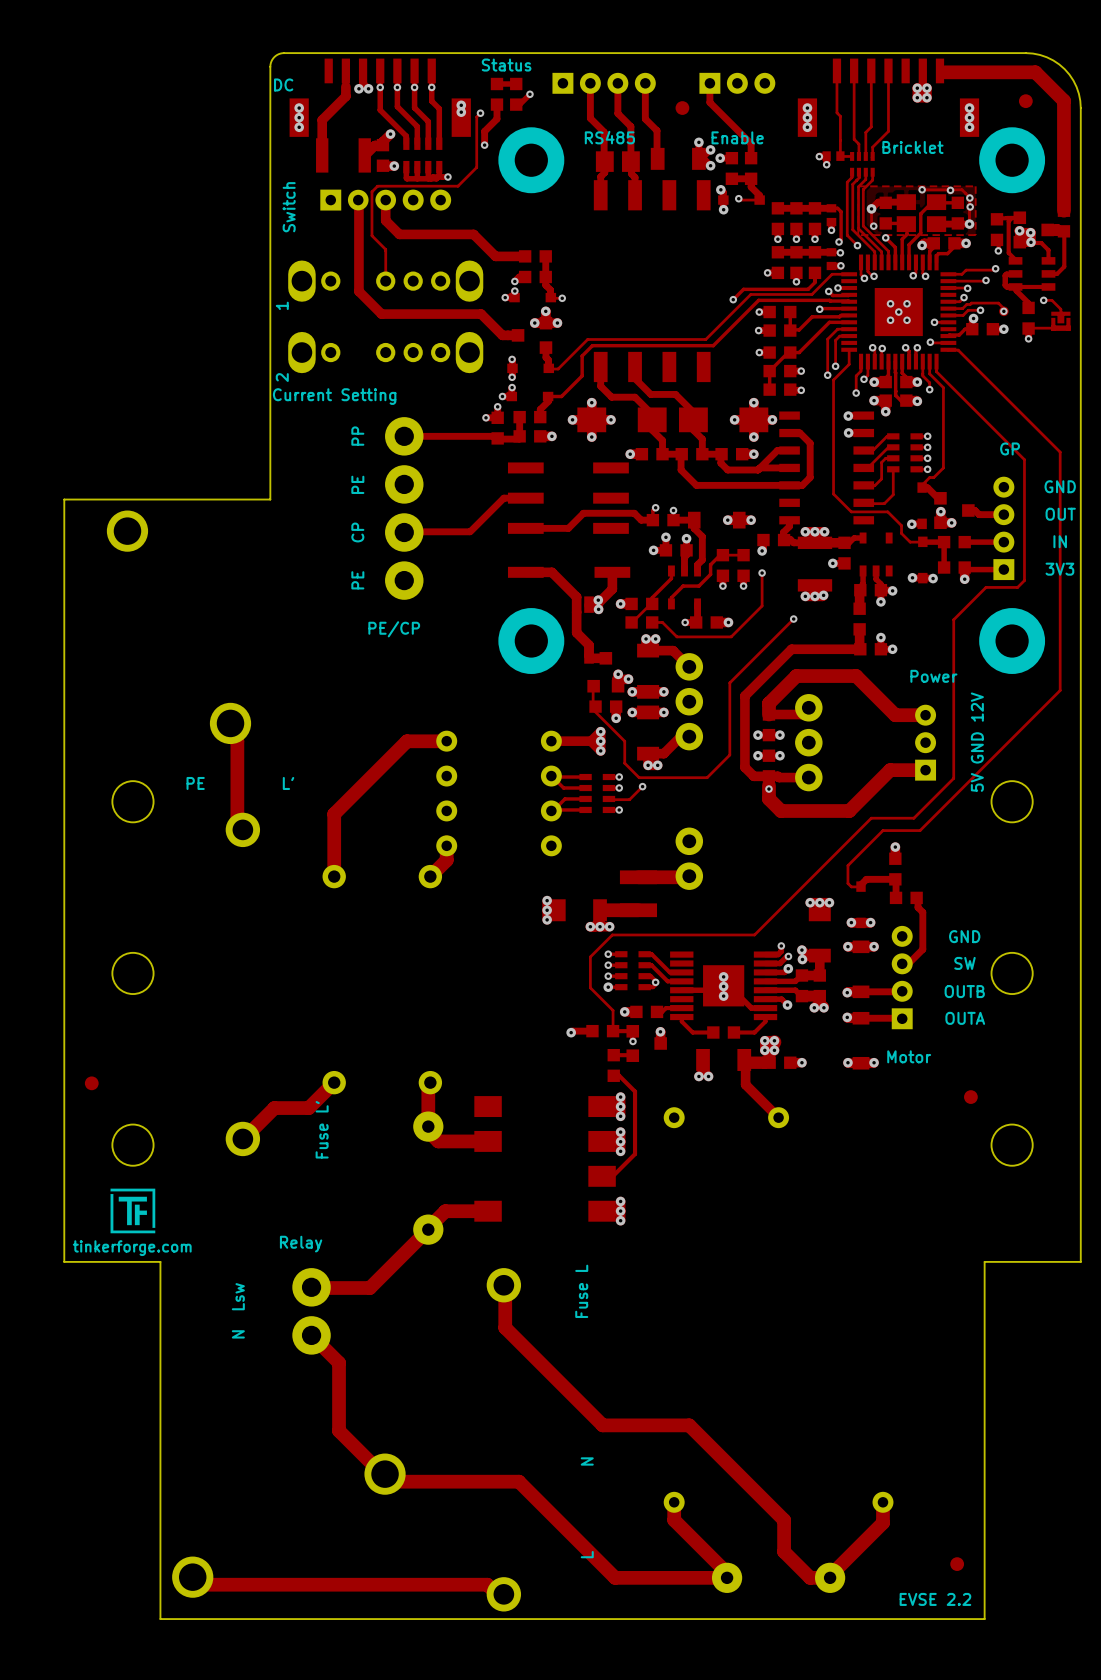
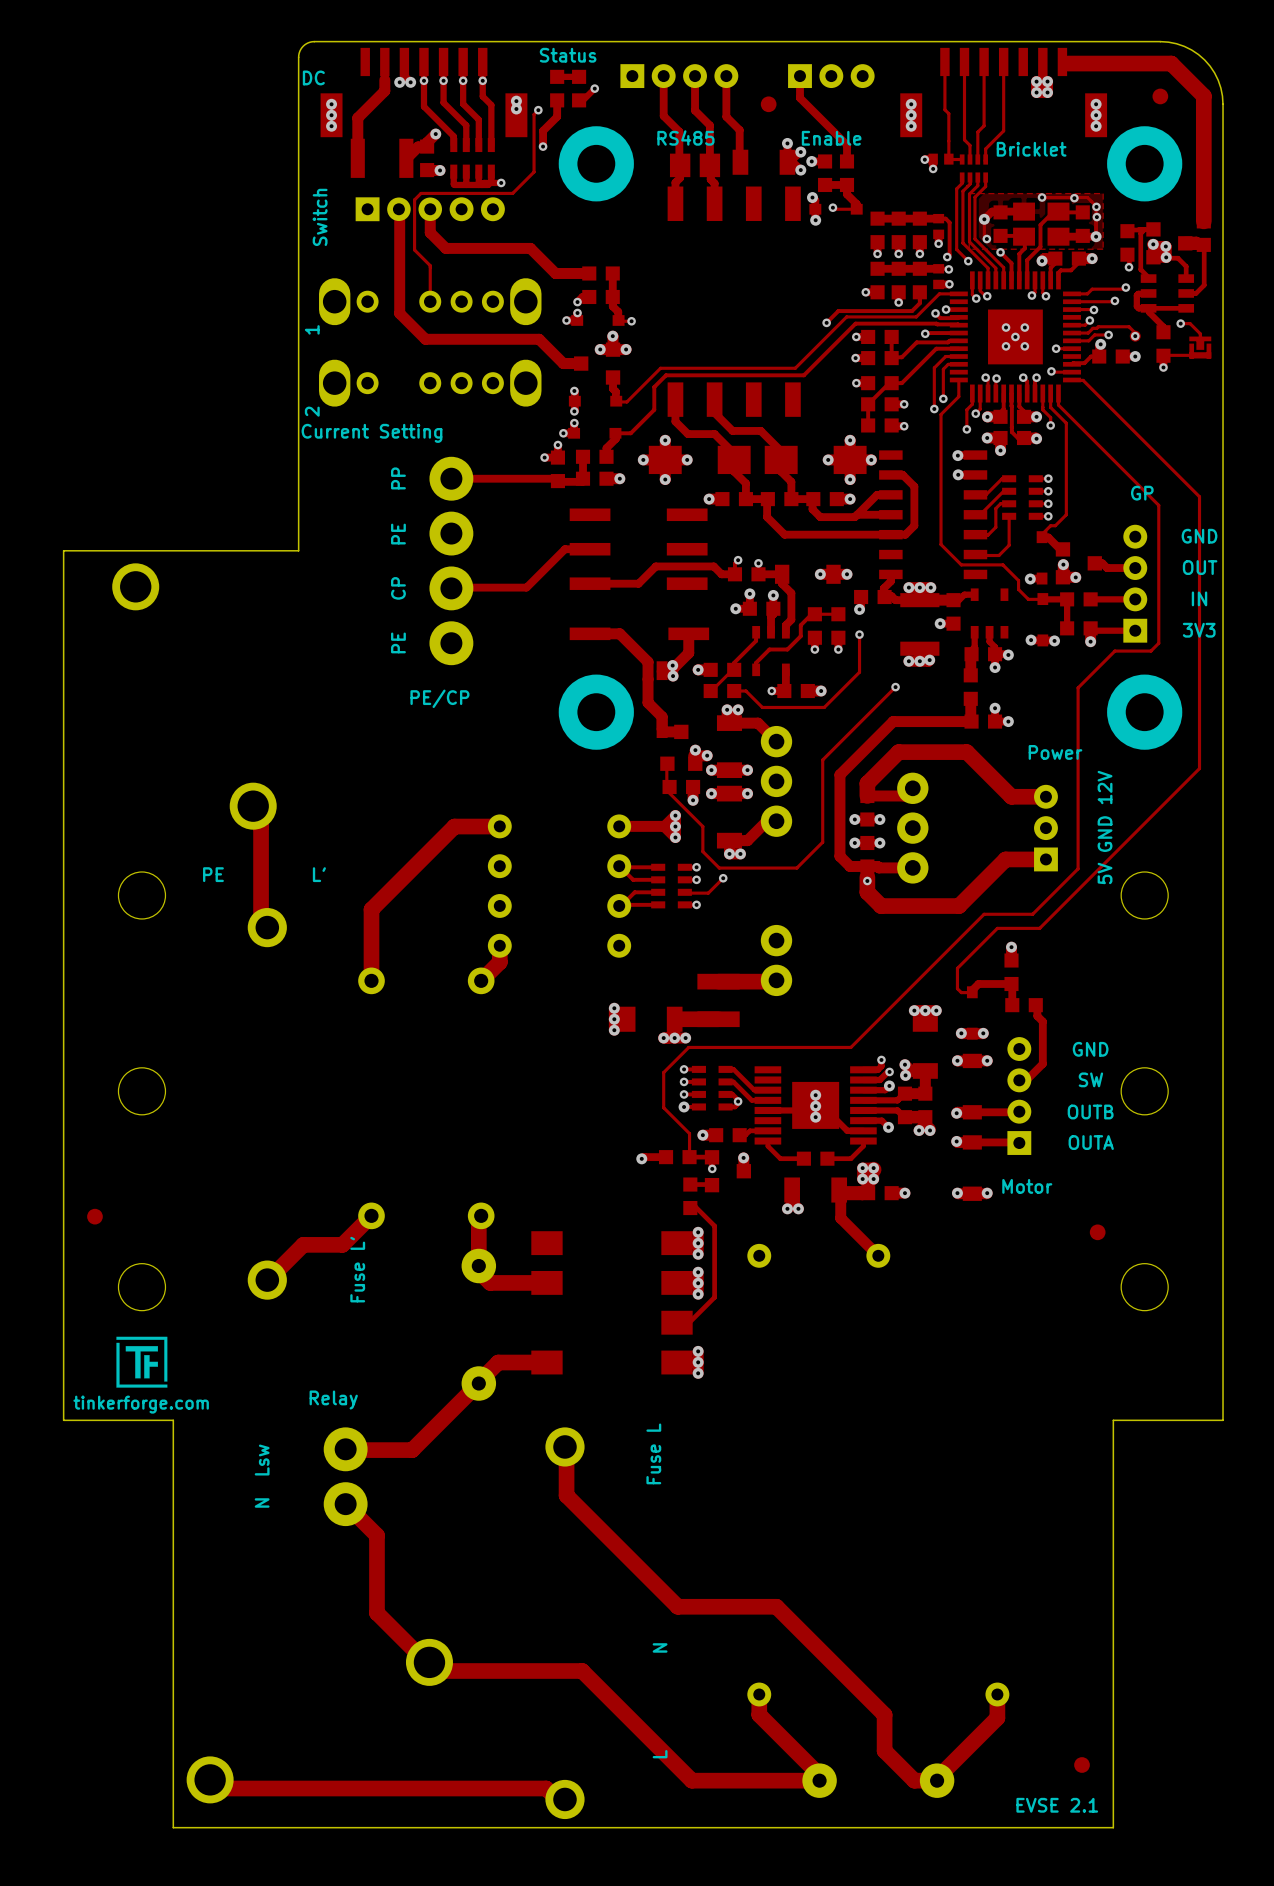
text: EVSE 2.2 (935, 1599) -> EVSE 2.1 (1057, 1805)

